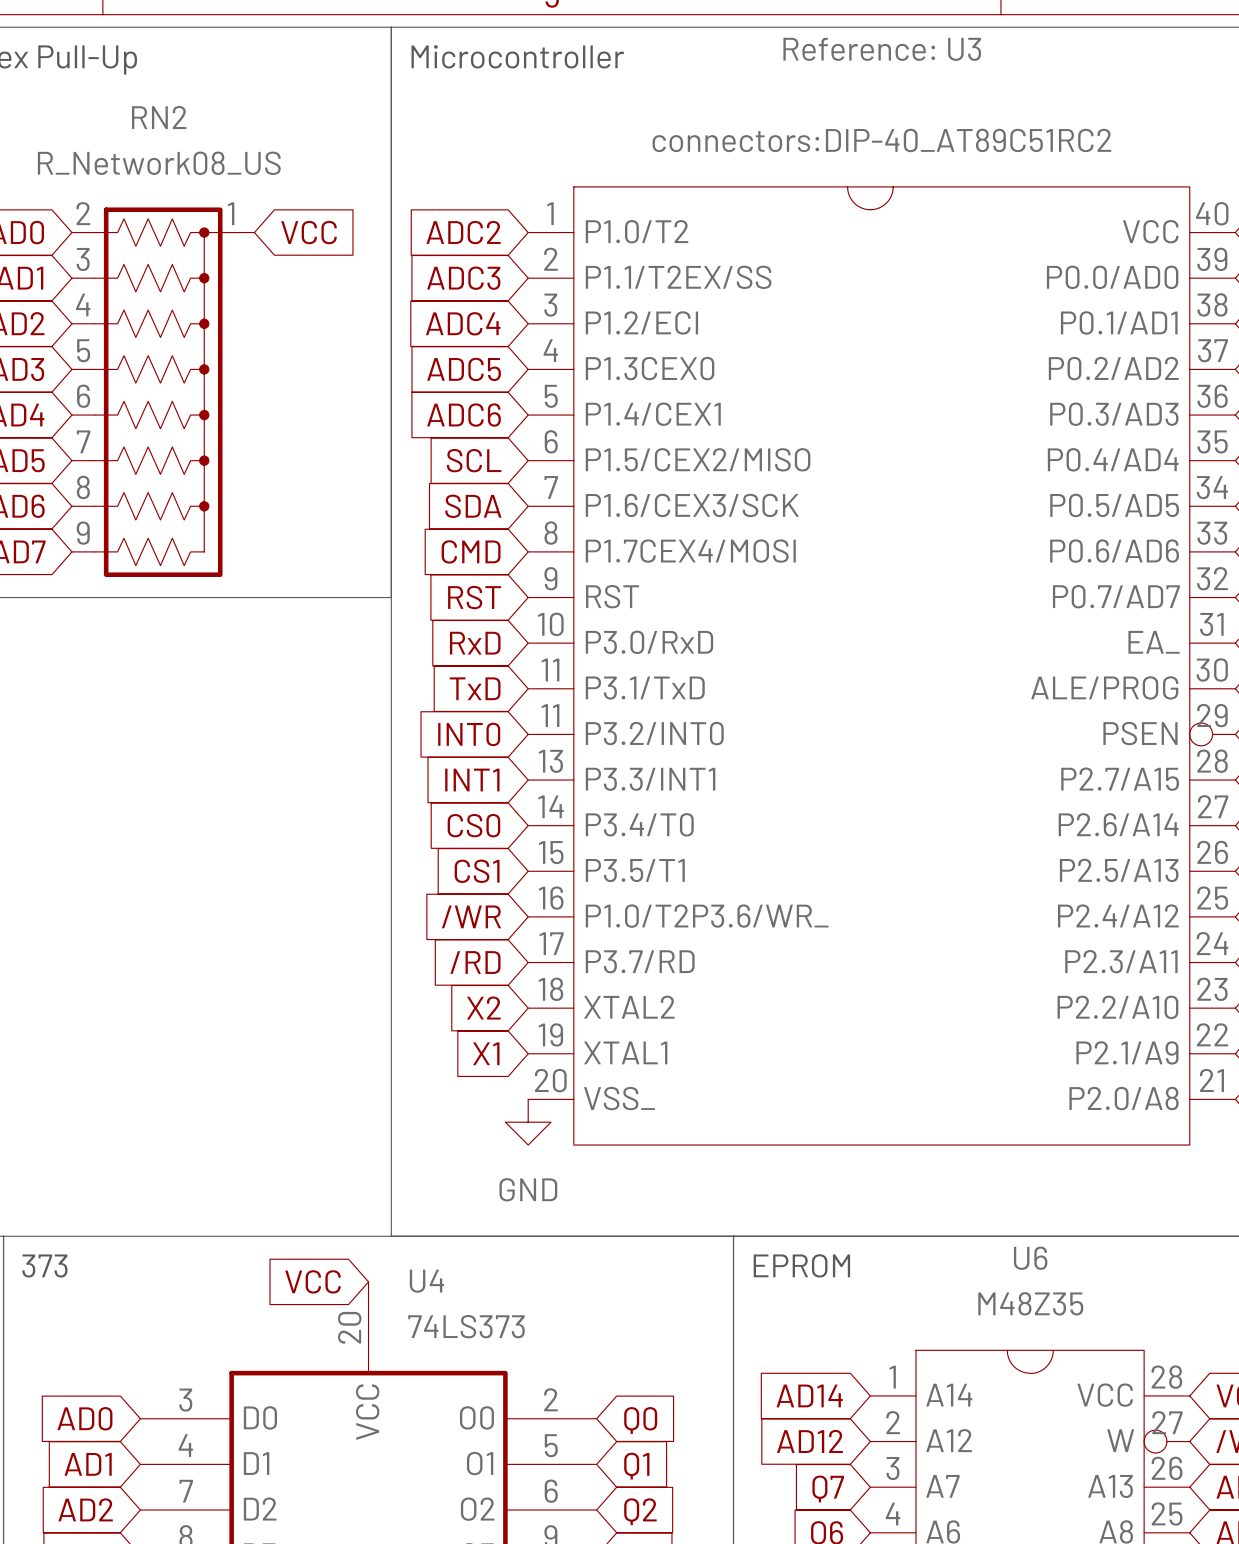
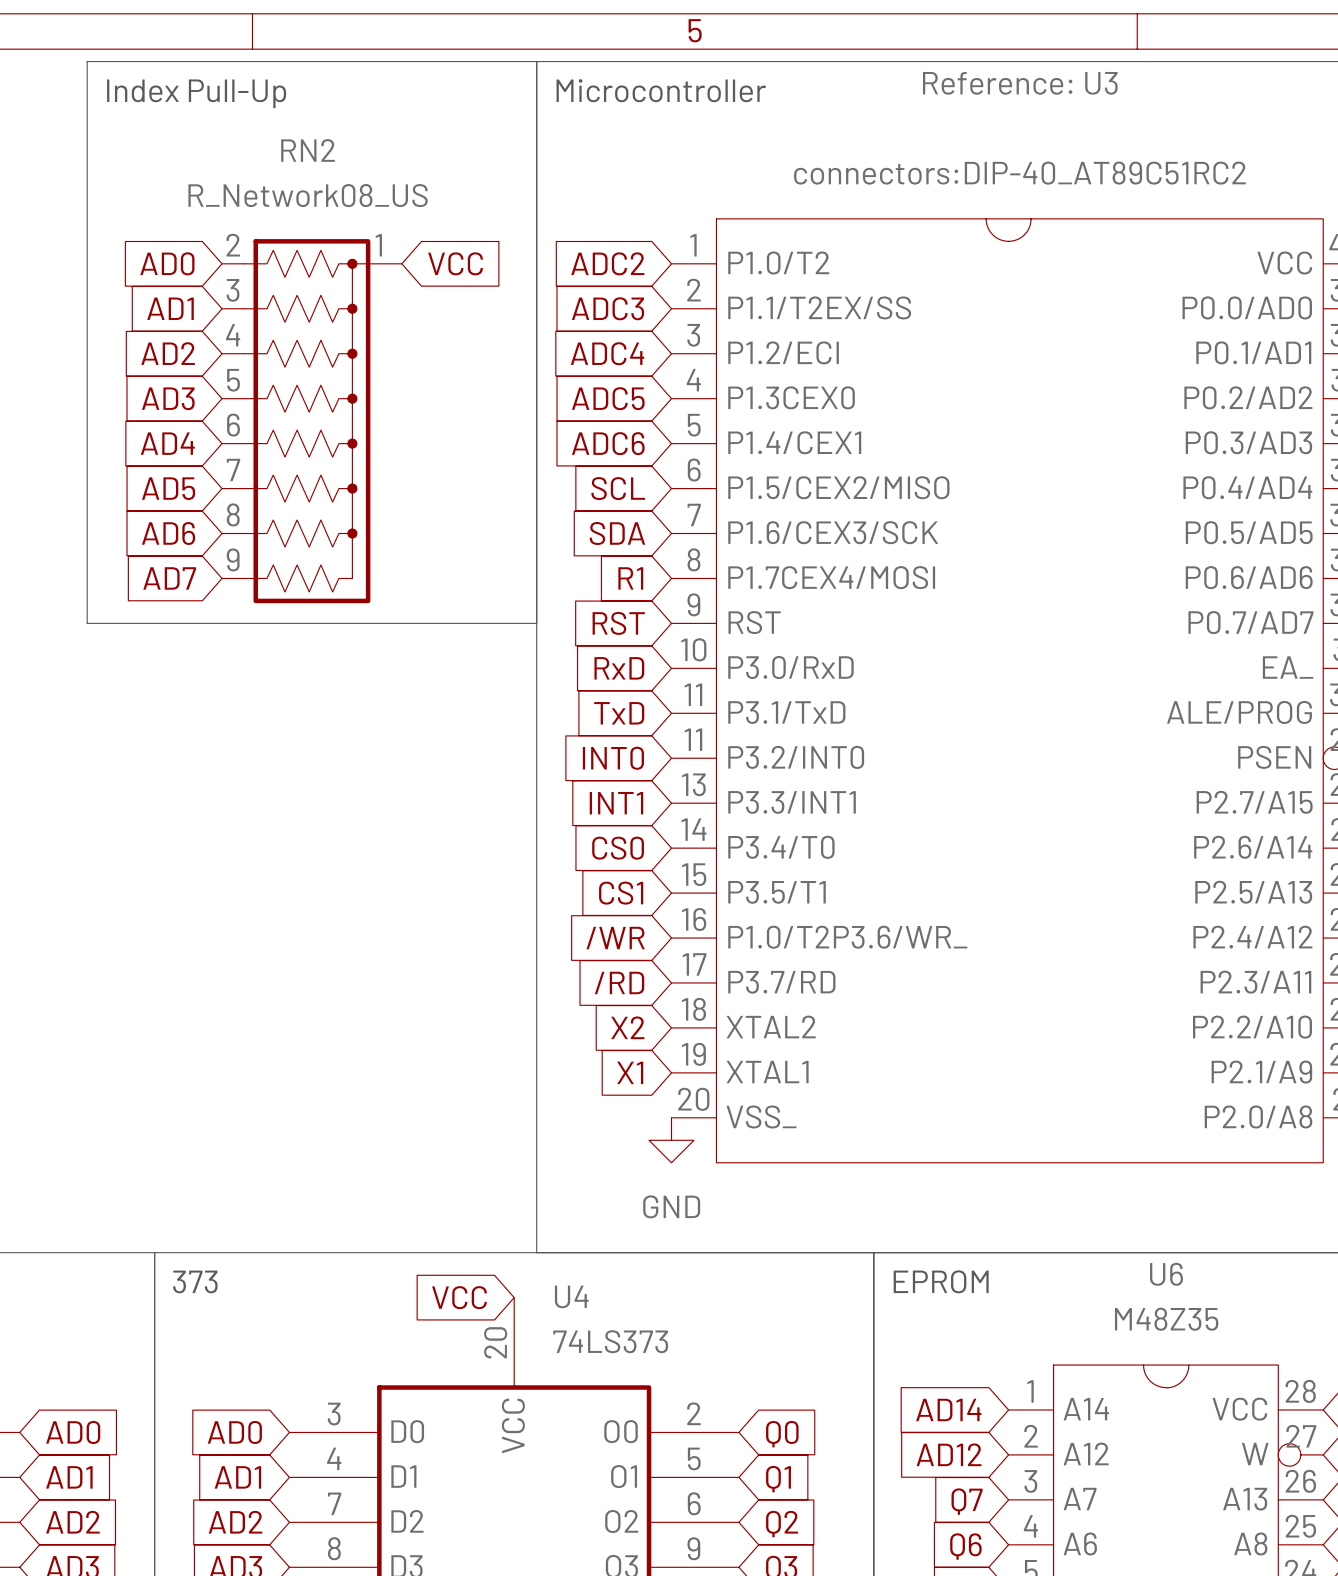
global label: CMD (471, 551) -> R1 (630, 578)

